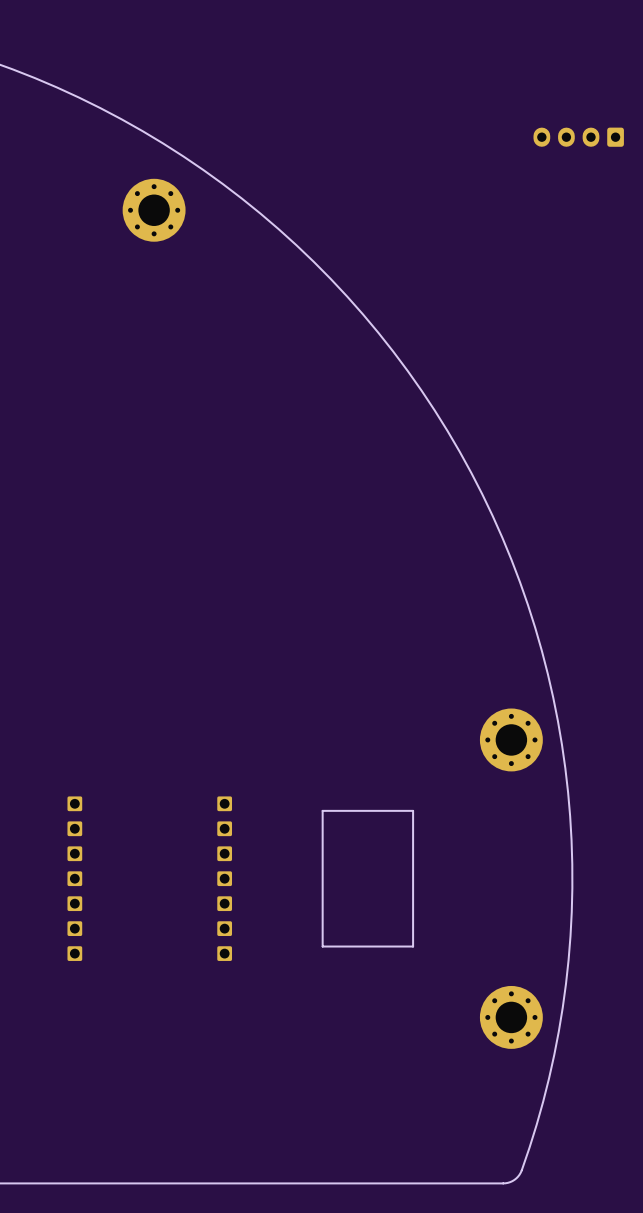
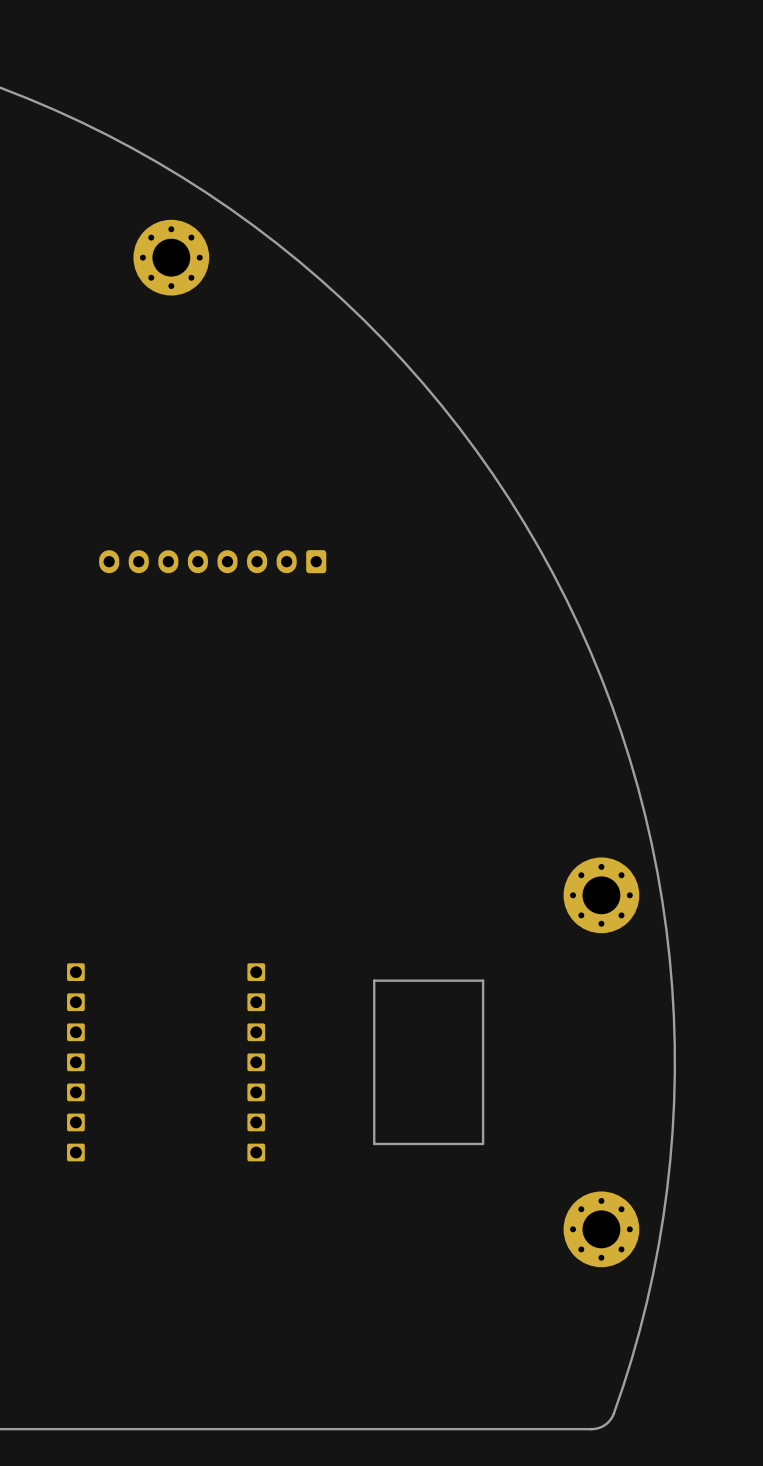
part: (578, 137) -> none
part: none -> (212, 561)

